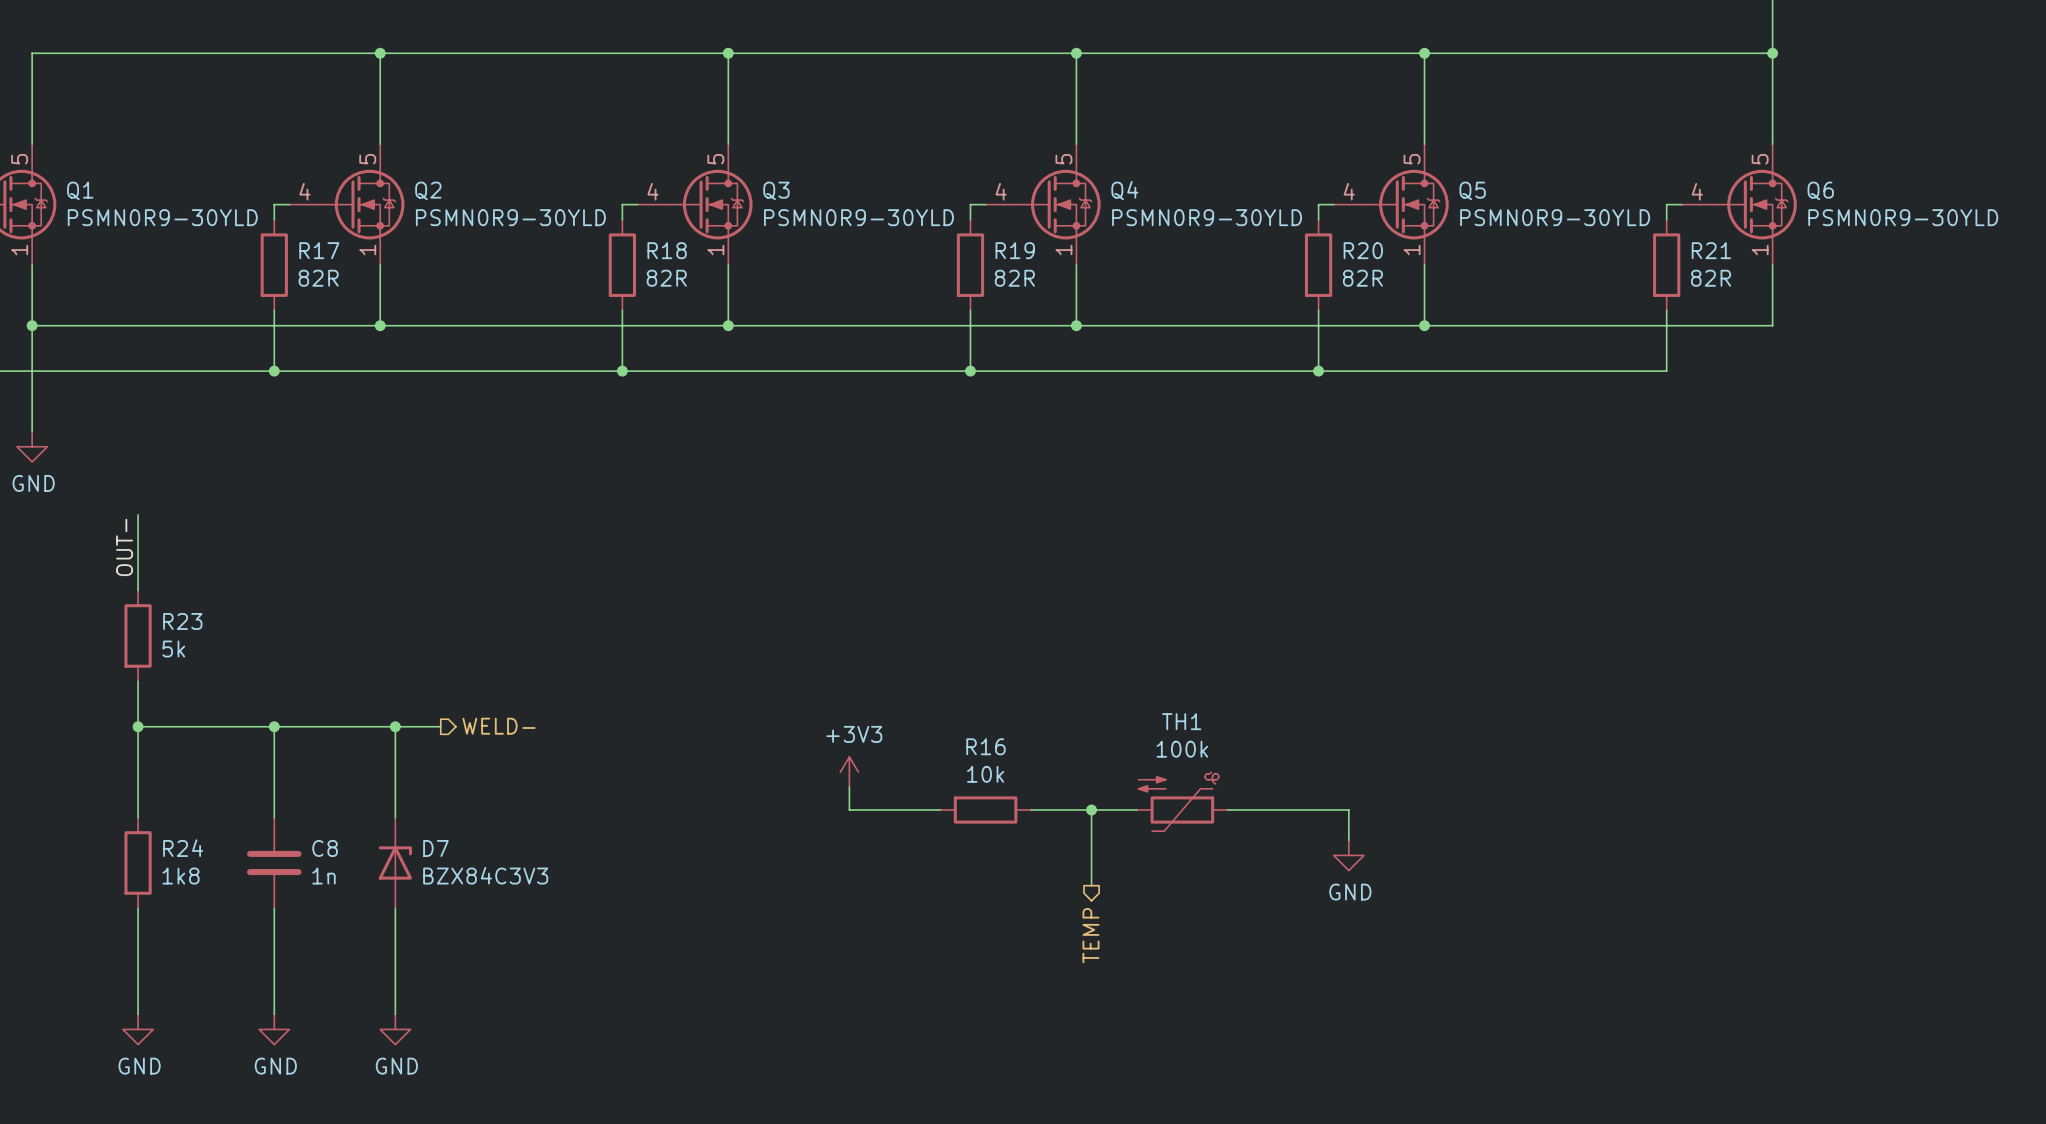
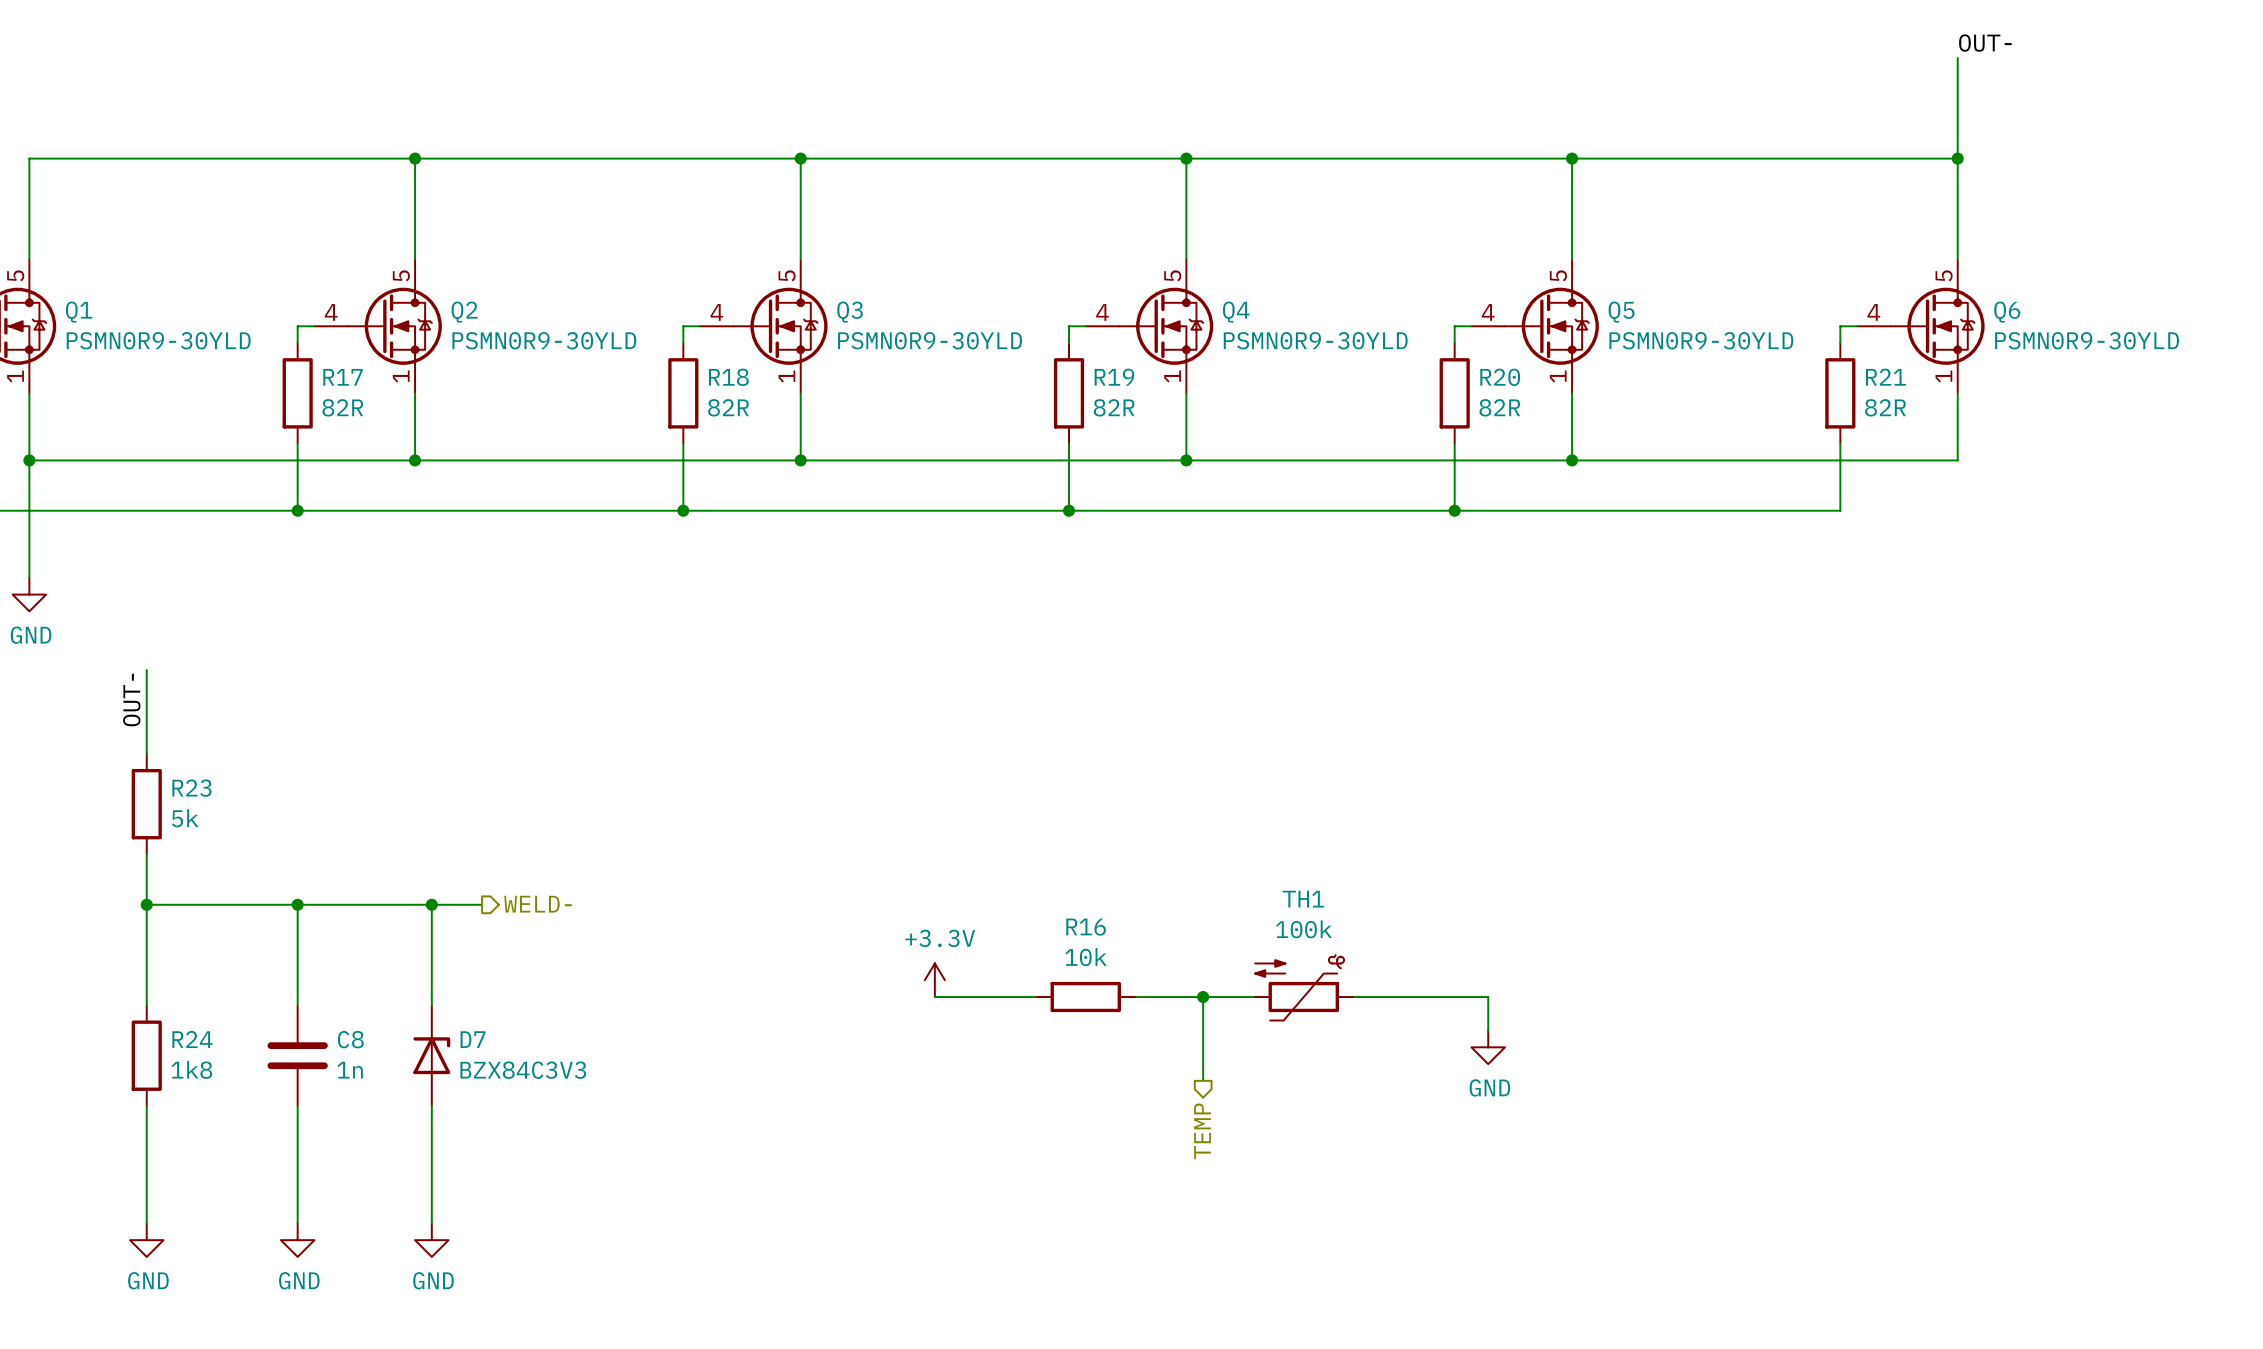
power symbol: +3V3 (849, 772) -> none
power symbol: none -> +3.3V (934, 980)

